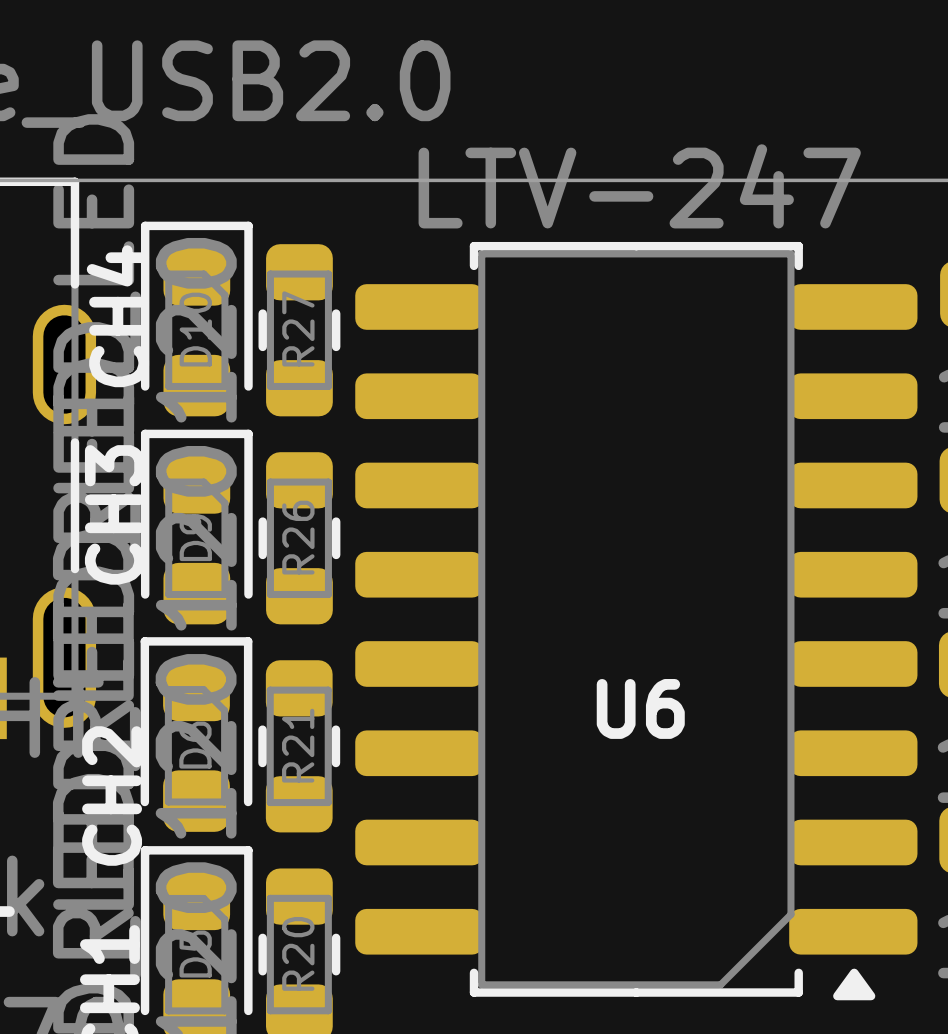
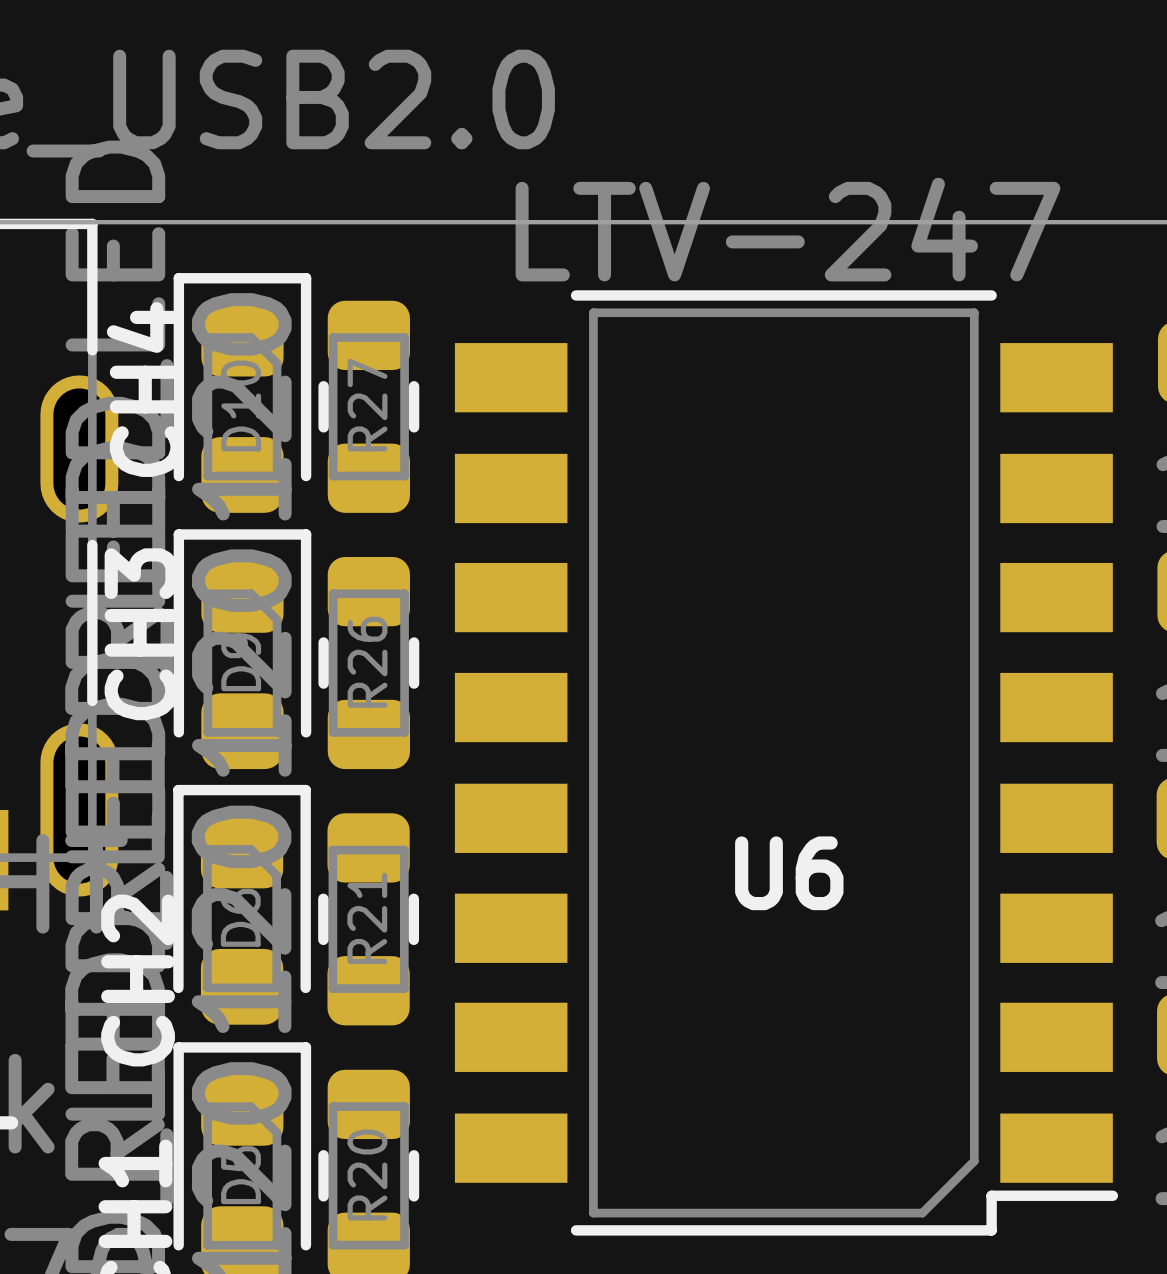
U6 footprint: [355, 241, 918, 1001] -> [454, 290, 1119, 1236]

